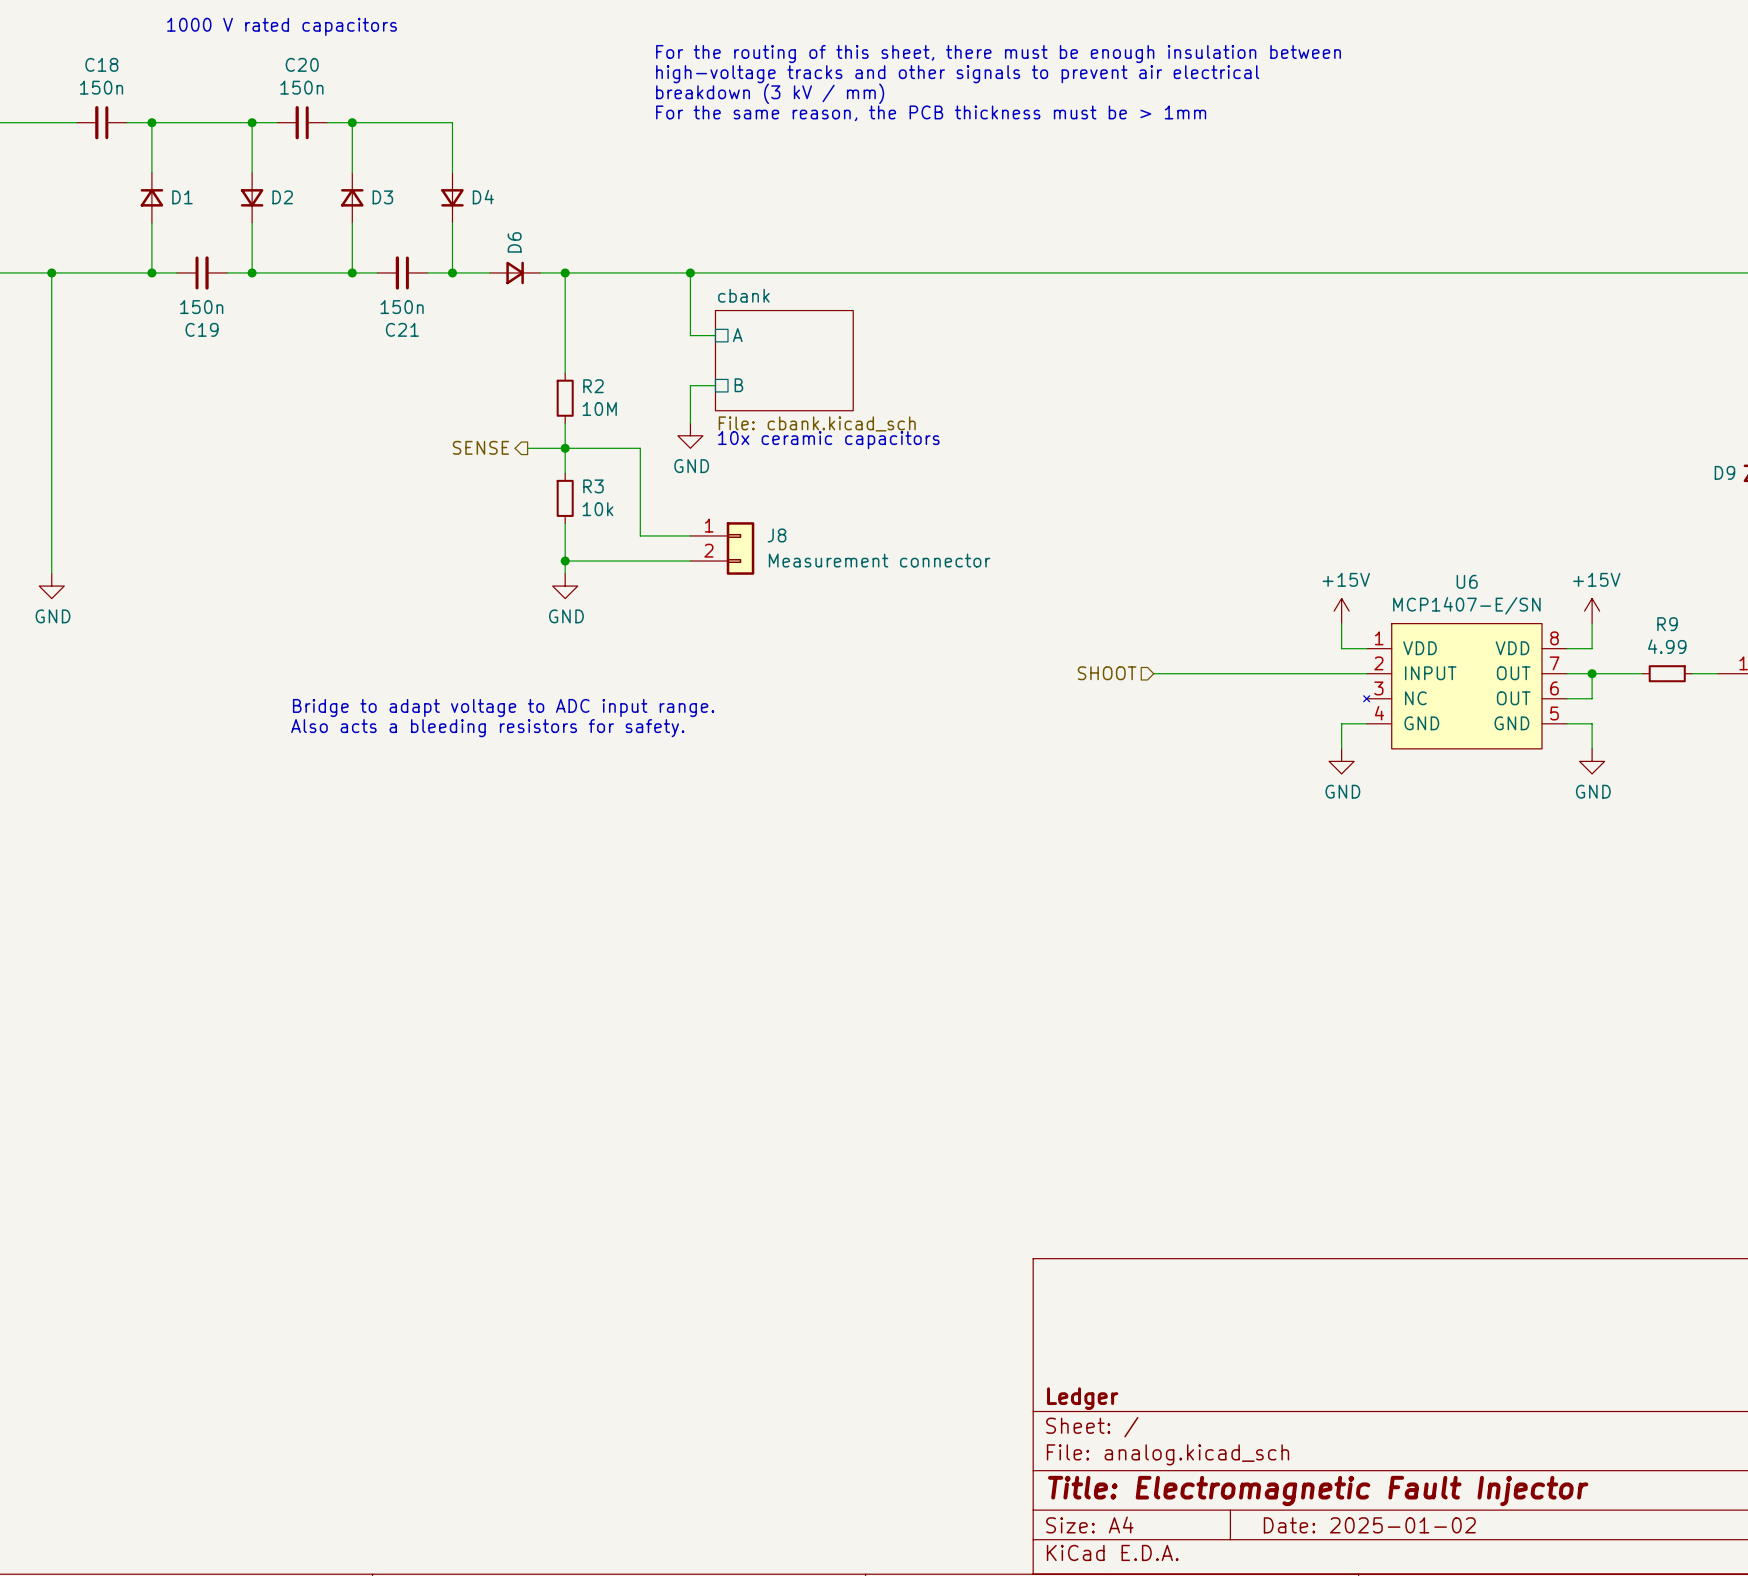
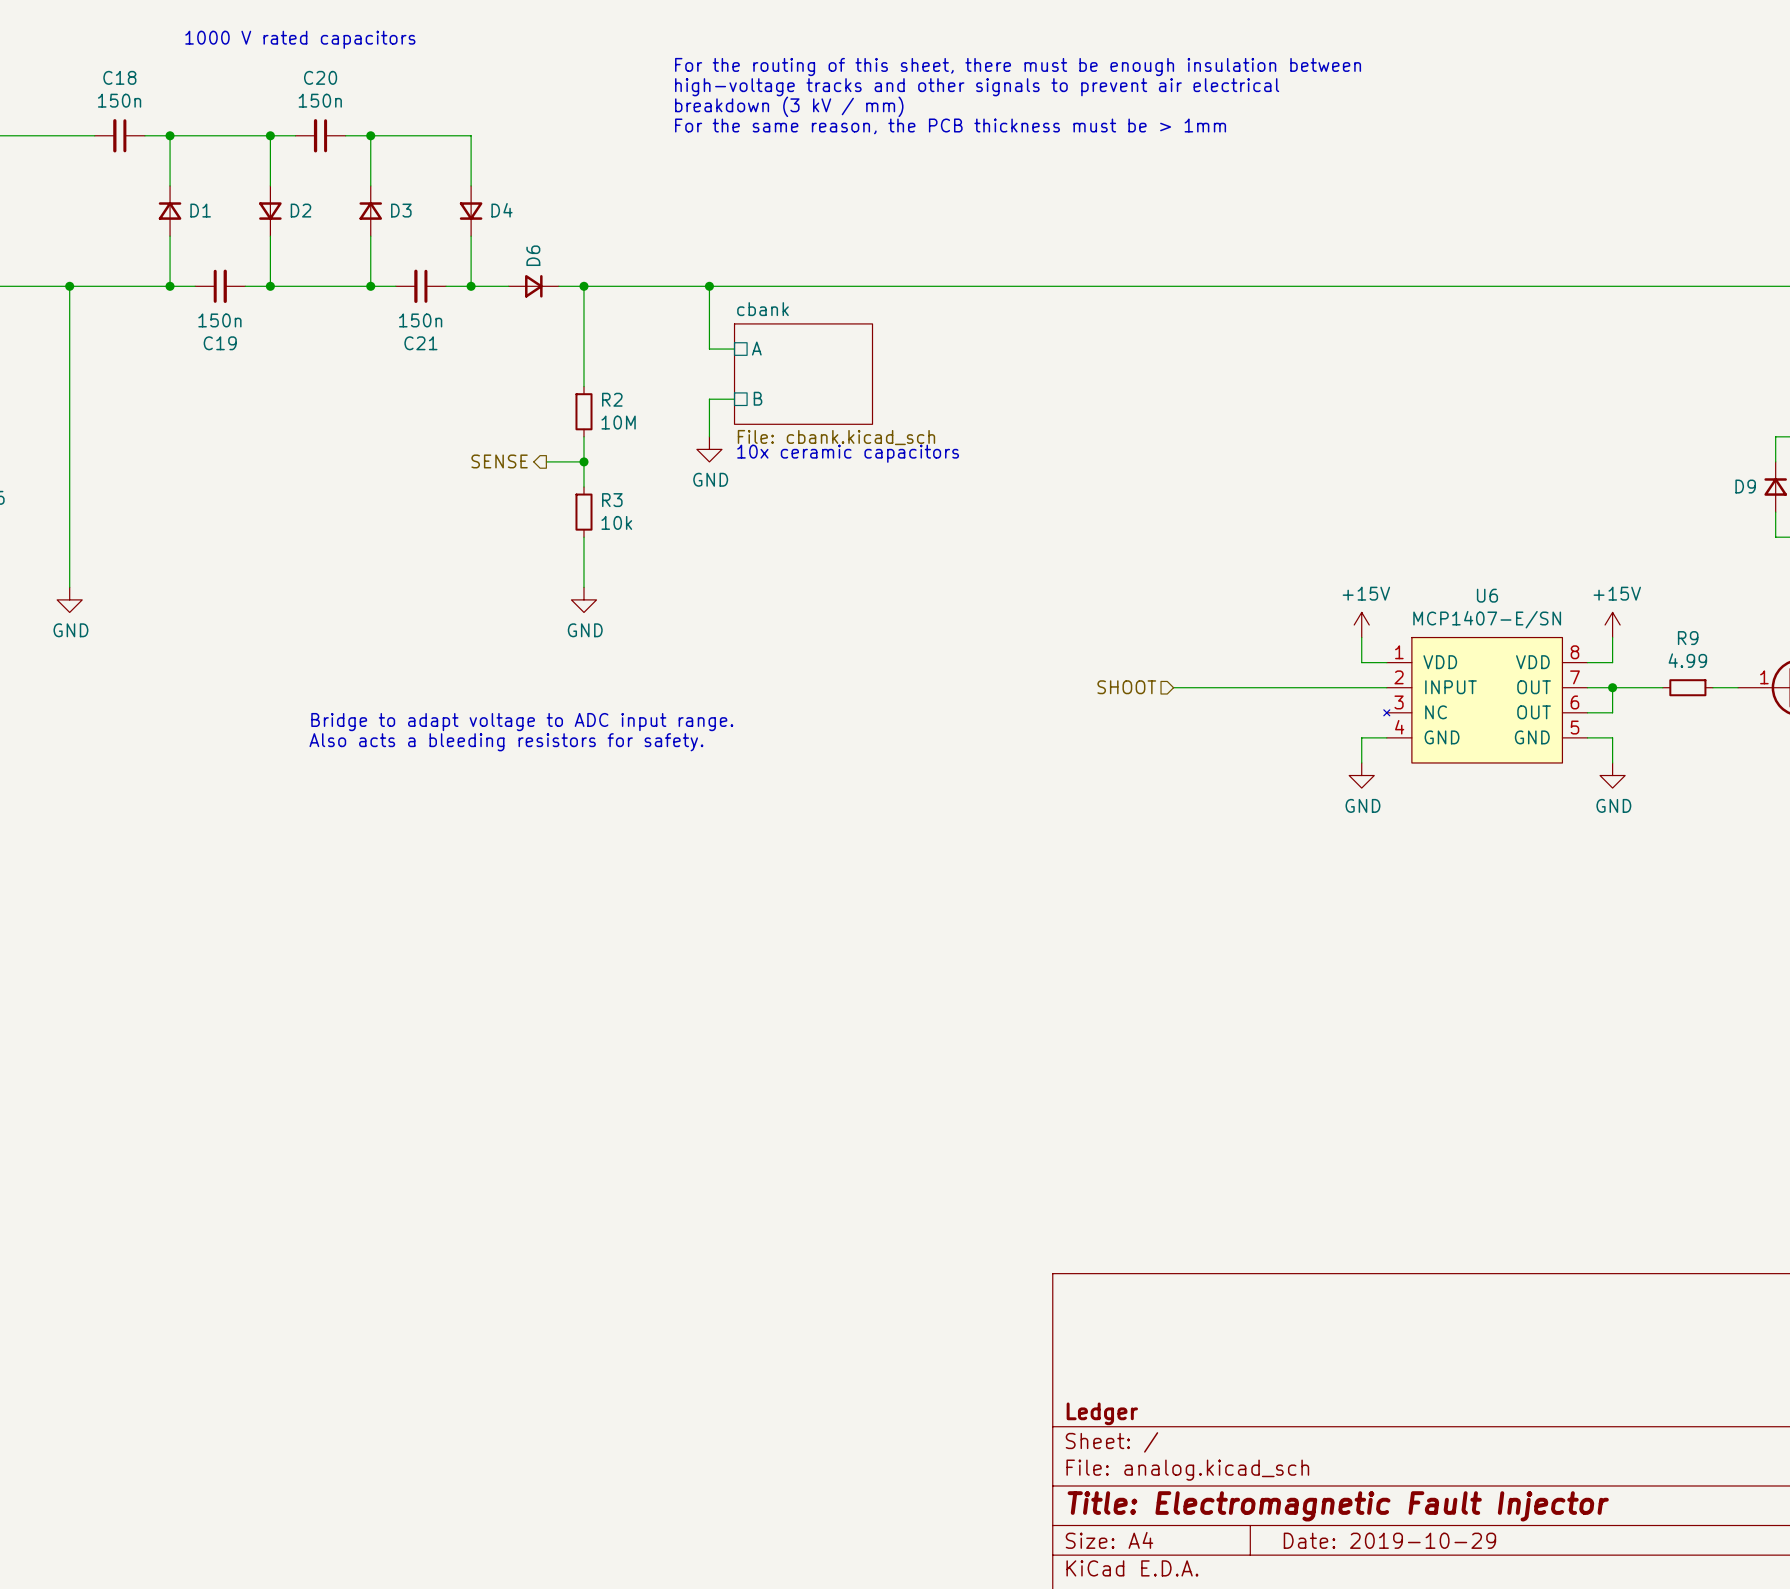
wire: (565, 448) (640, 448) (640, 535) (690, 535) -> none
J8: Measurement connector (722, 548) -> none
wire: (565, 561) (690, 561) -> none
junction: (565, 561) -> none
title block: Date: 2025-01-02 (1369, 1525) -> Date: 2019-10-29 (1389, 1540)

